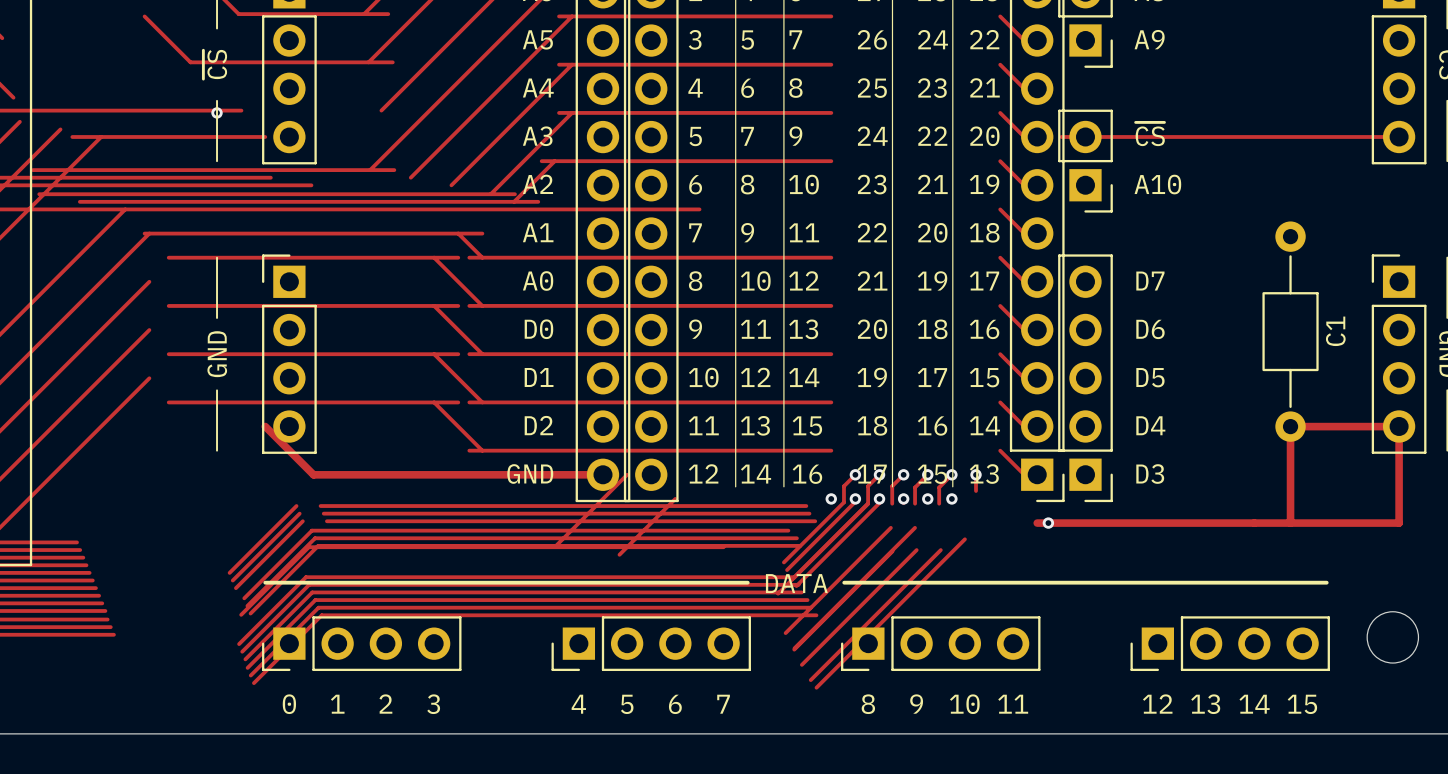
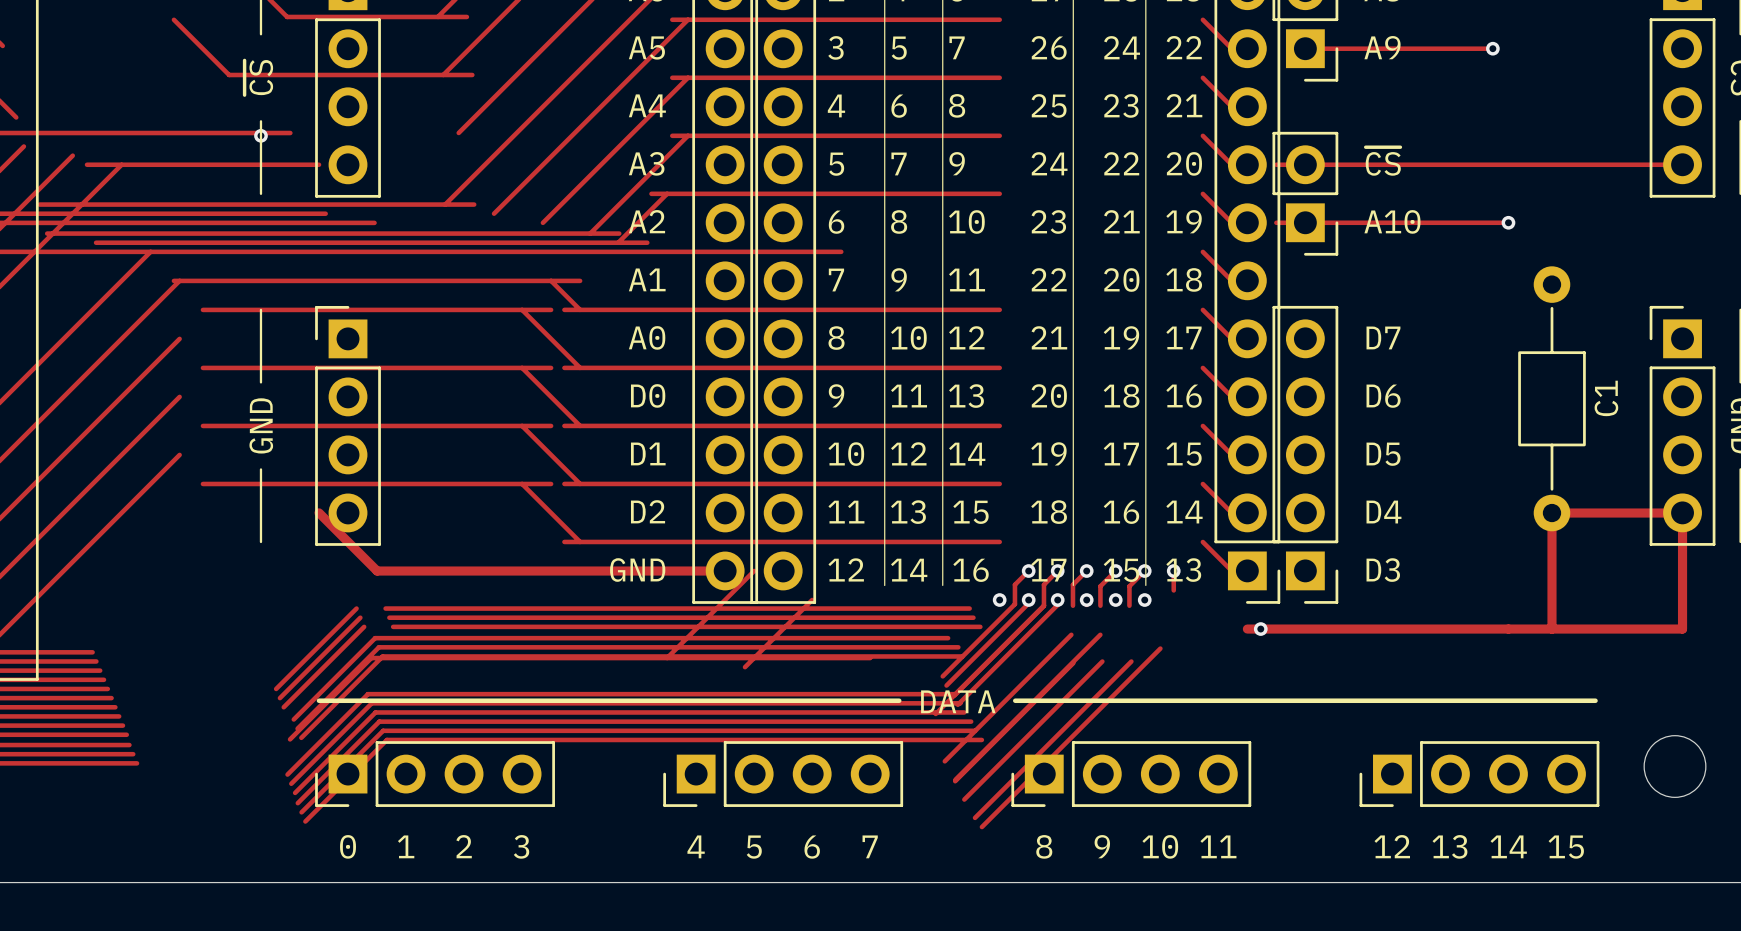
track: none -> (1289, 48) (1492, 48)
via: none -> (1492, 48)
track: none -> (1276, 222) (1508, 222)
via: none -> (1508, 222)

